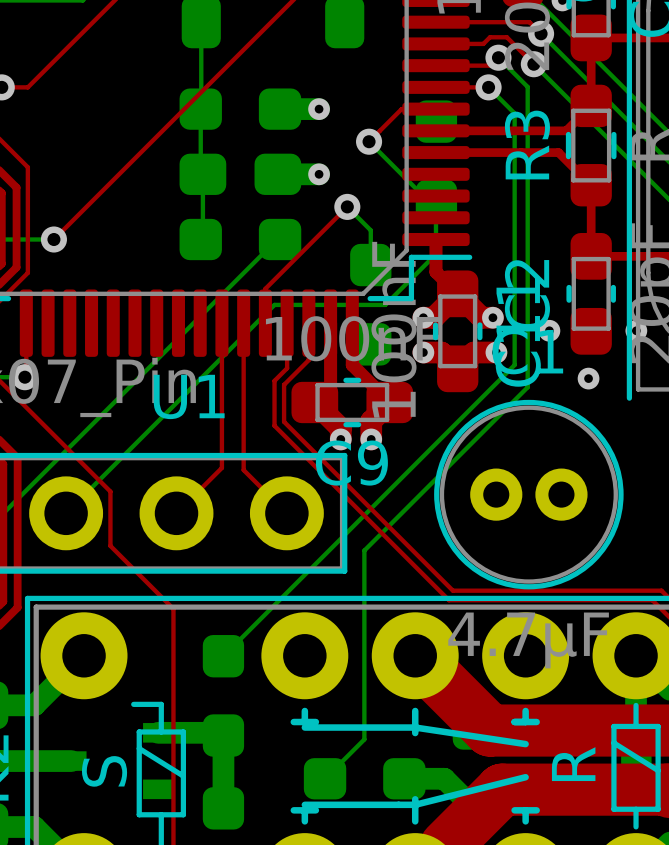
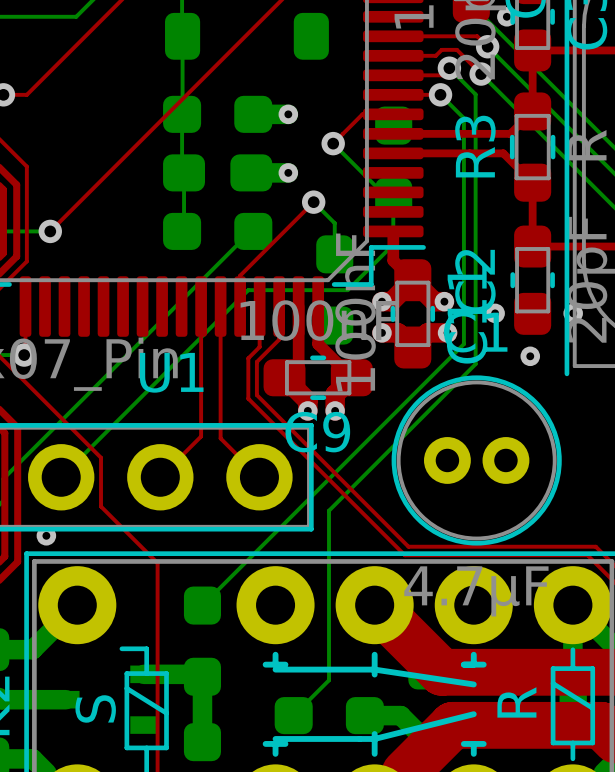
via: none -> (46, 535)

